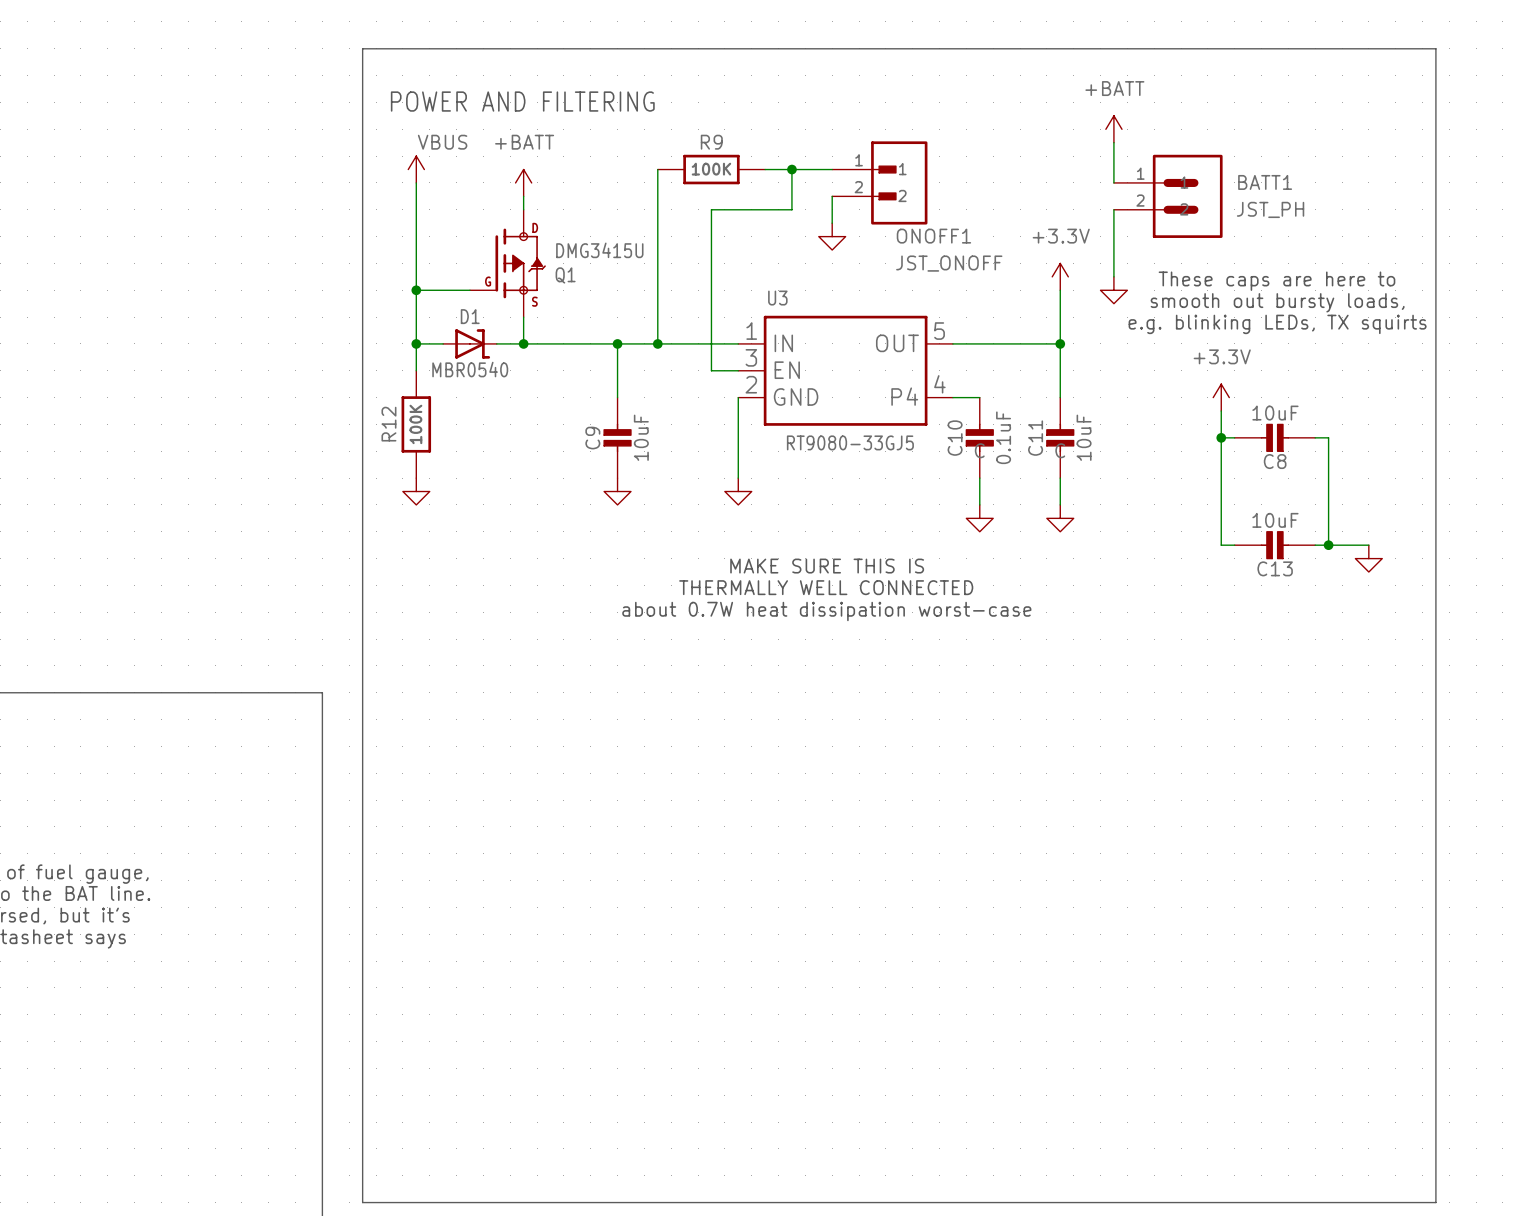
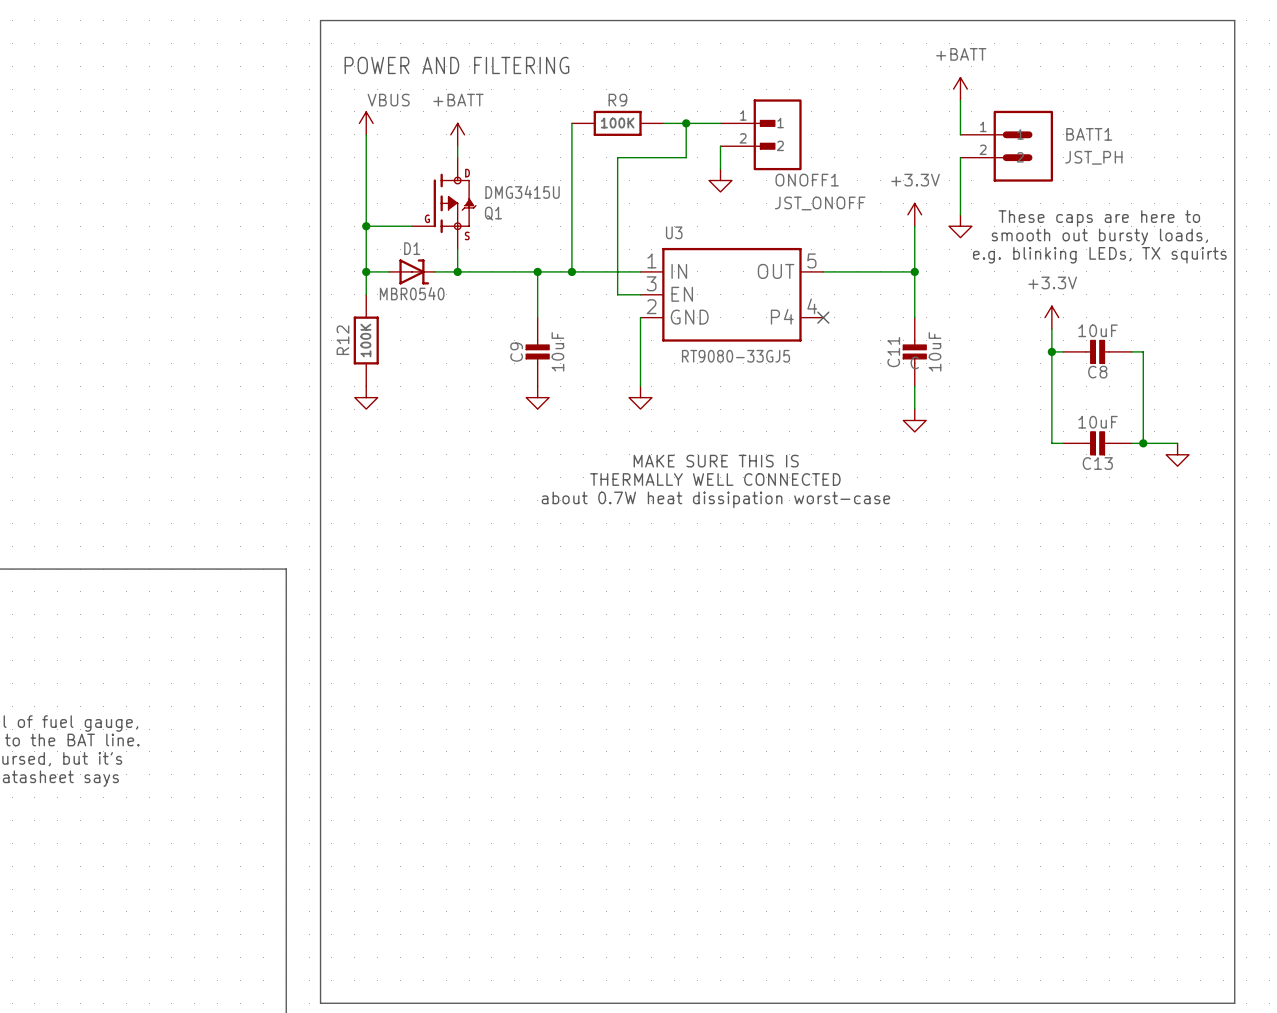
wire: (952, 397) (979, 397) -> none
no-connect mark: none -> (823, 317)
C10: 0.1uF (979, 437) -> none
wire: (979, 478) (979, 504) -> none
power symbol: (979, 518) -> none

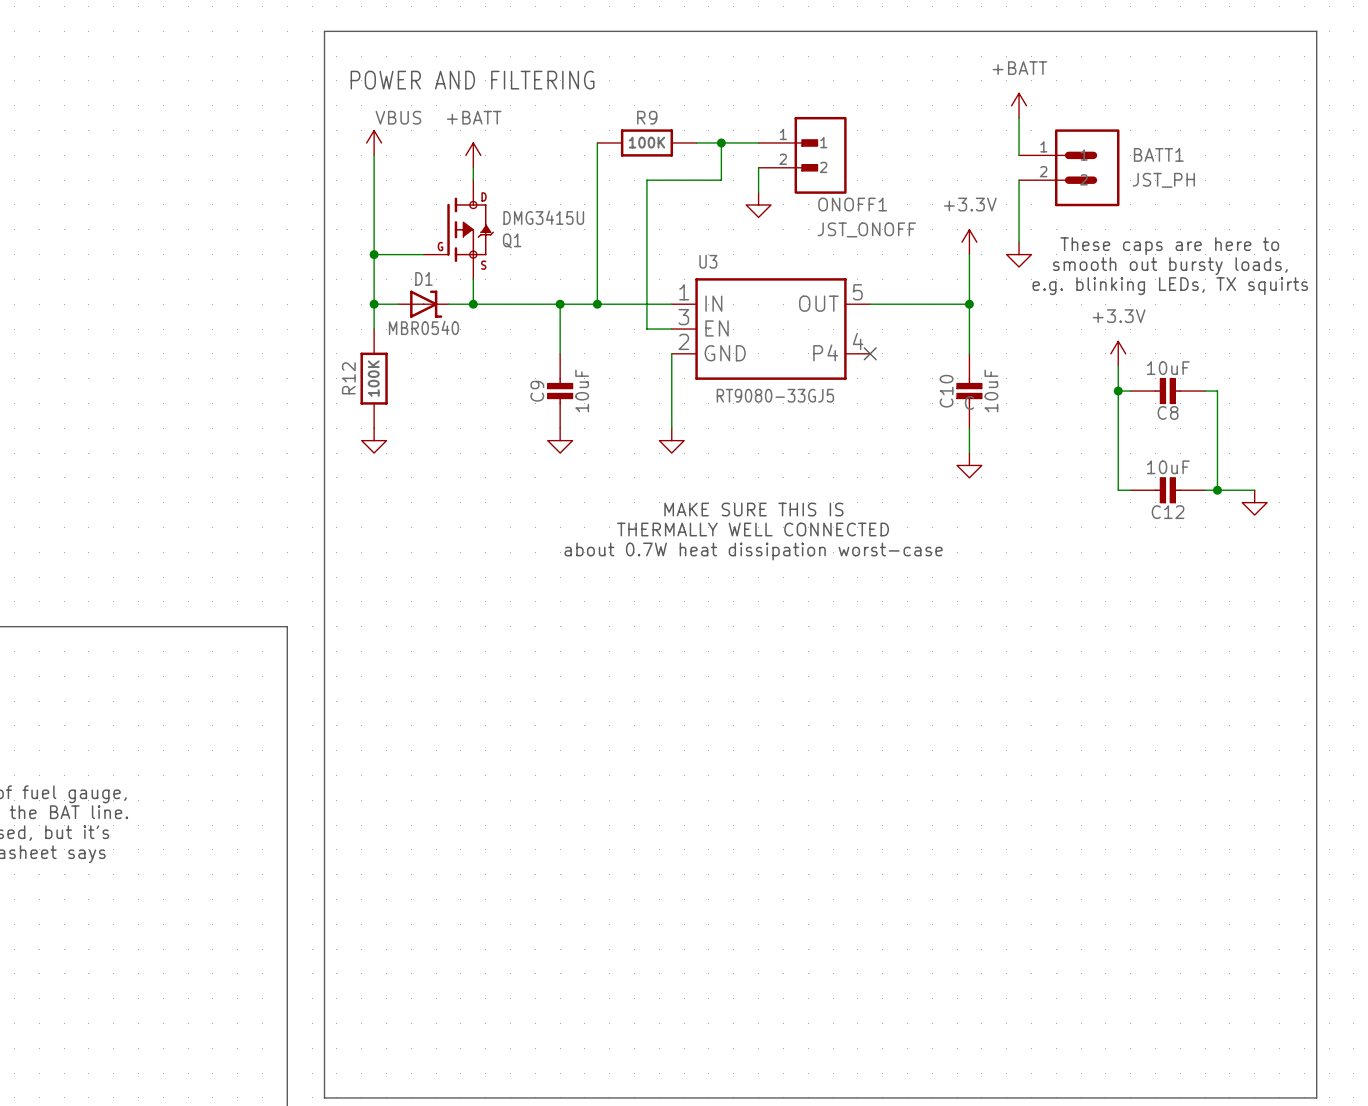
C11 name: C11 (893, 352) -> C10 (946, 391)
C13 name: C13 (1097, 463) -> C12 (1168, 512)

